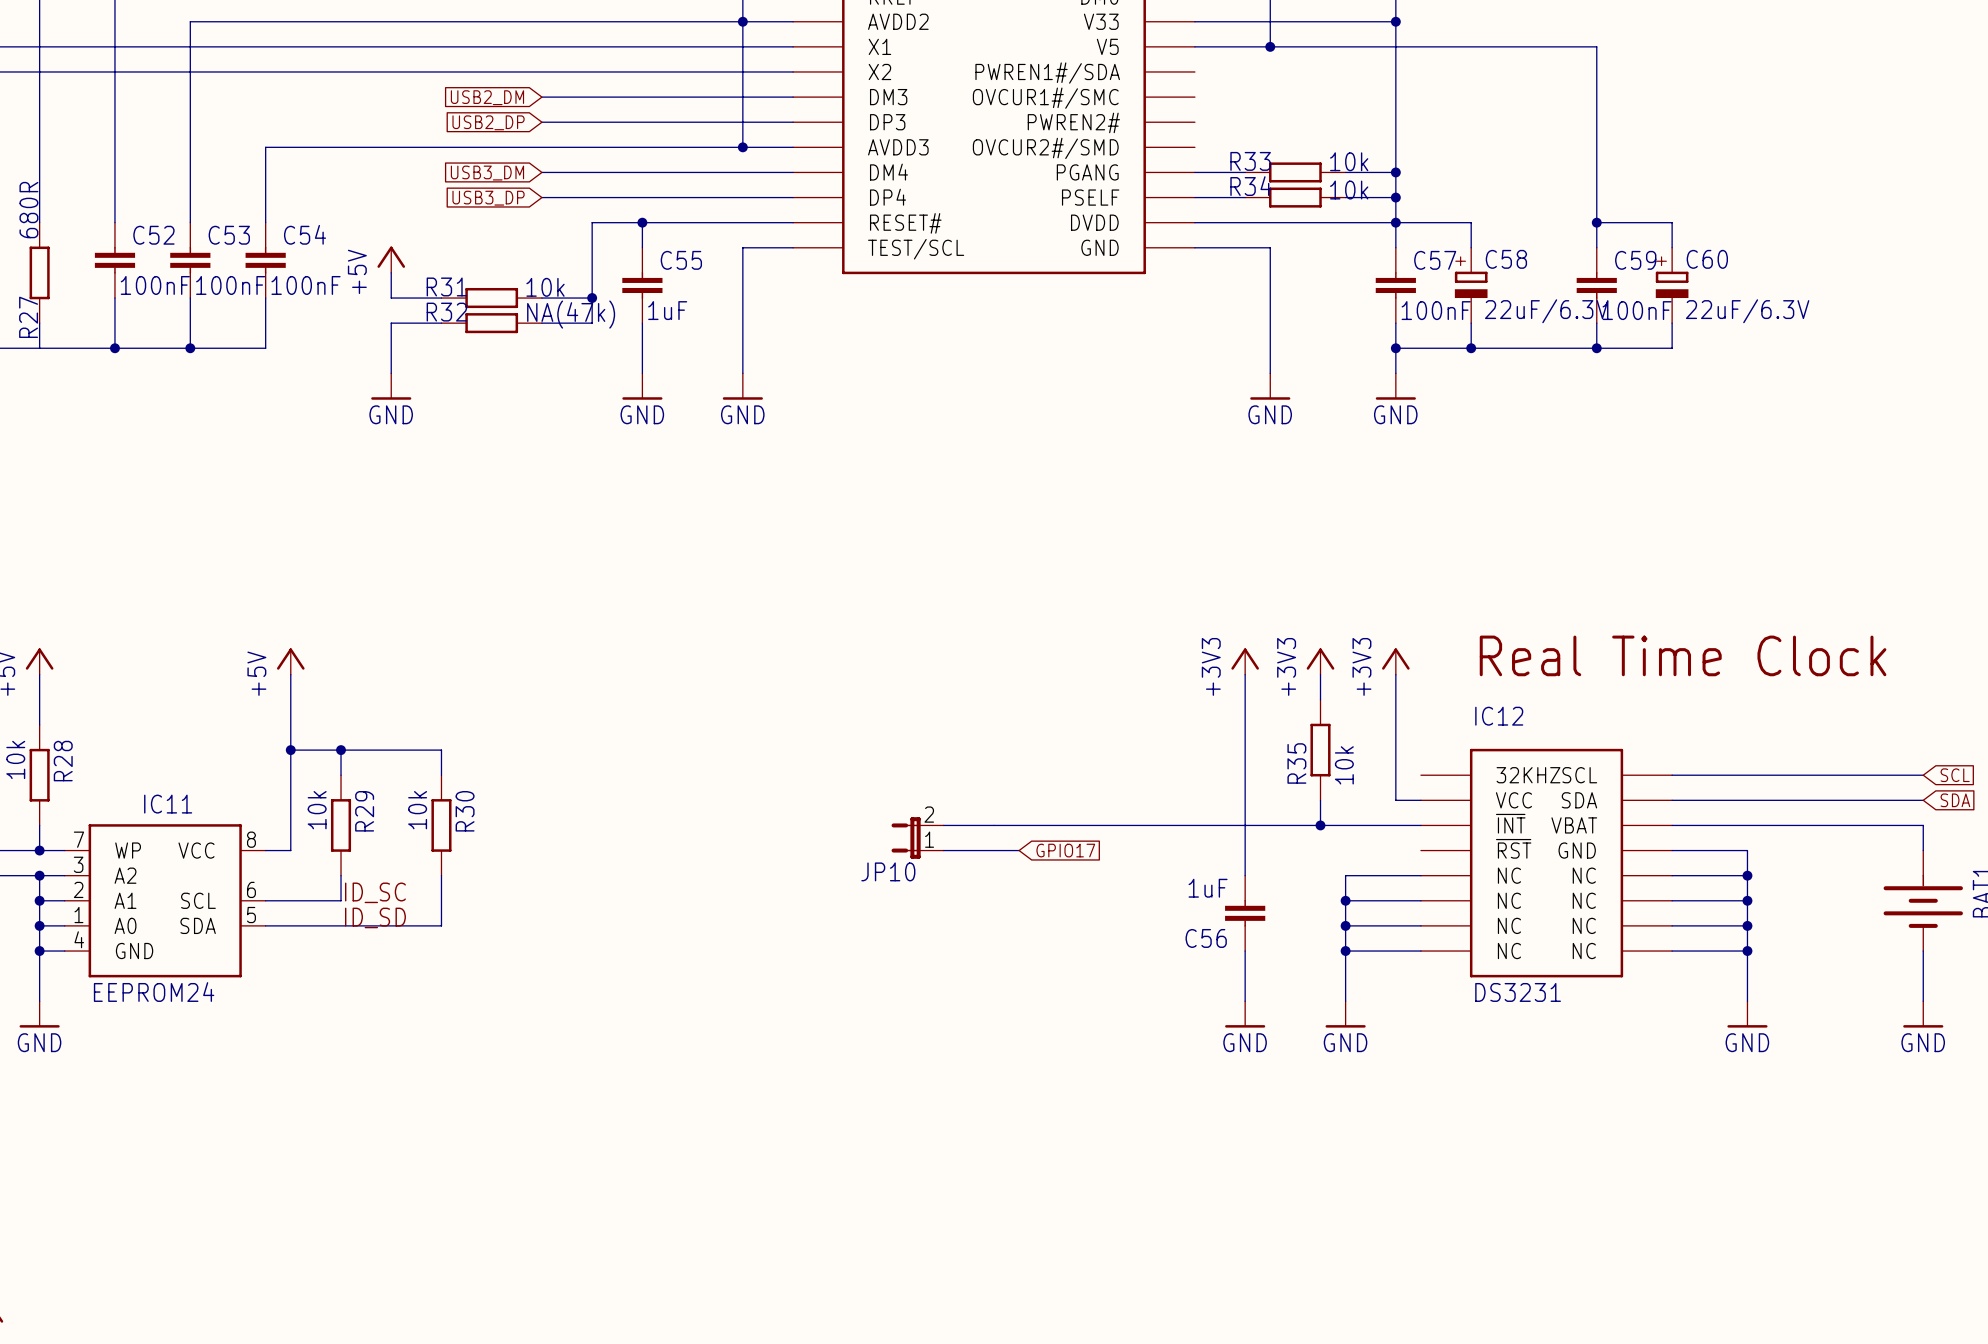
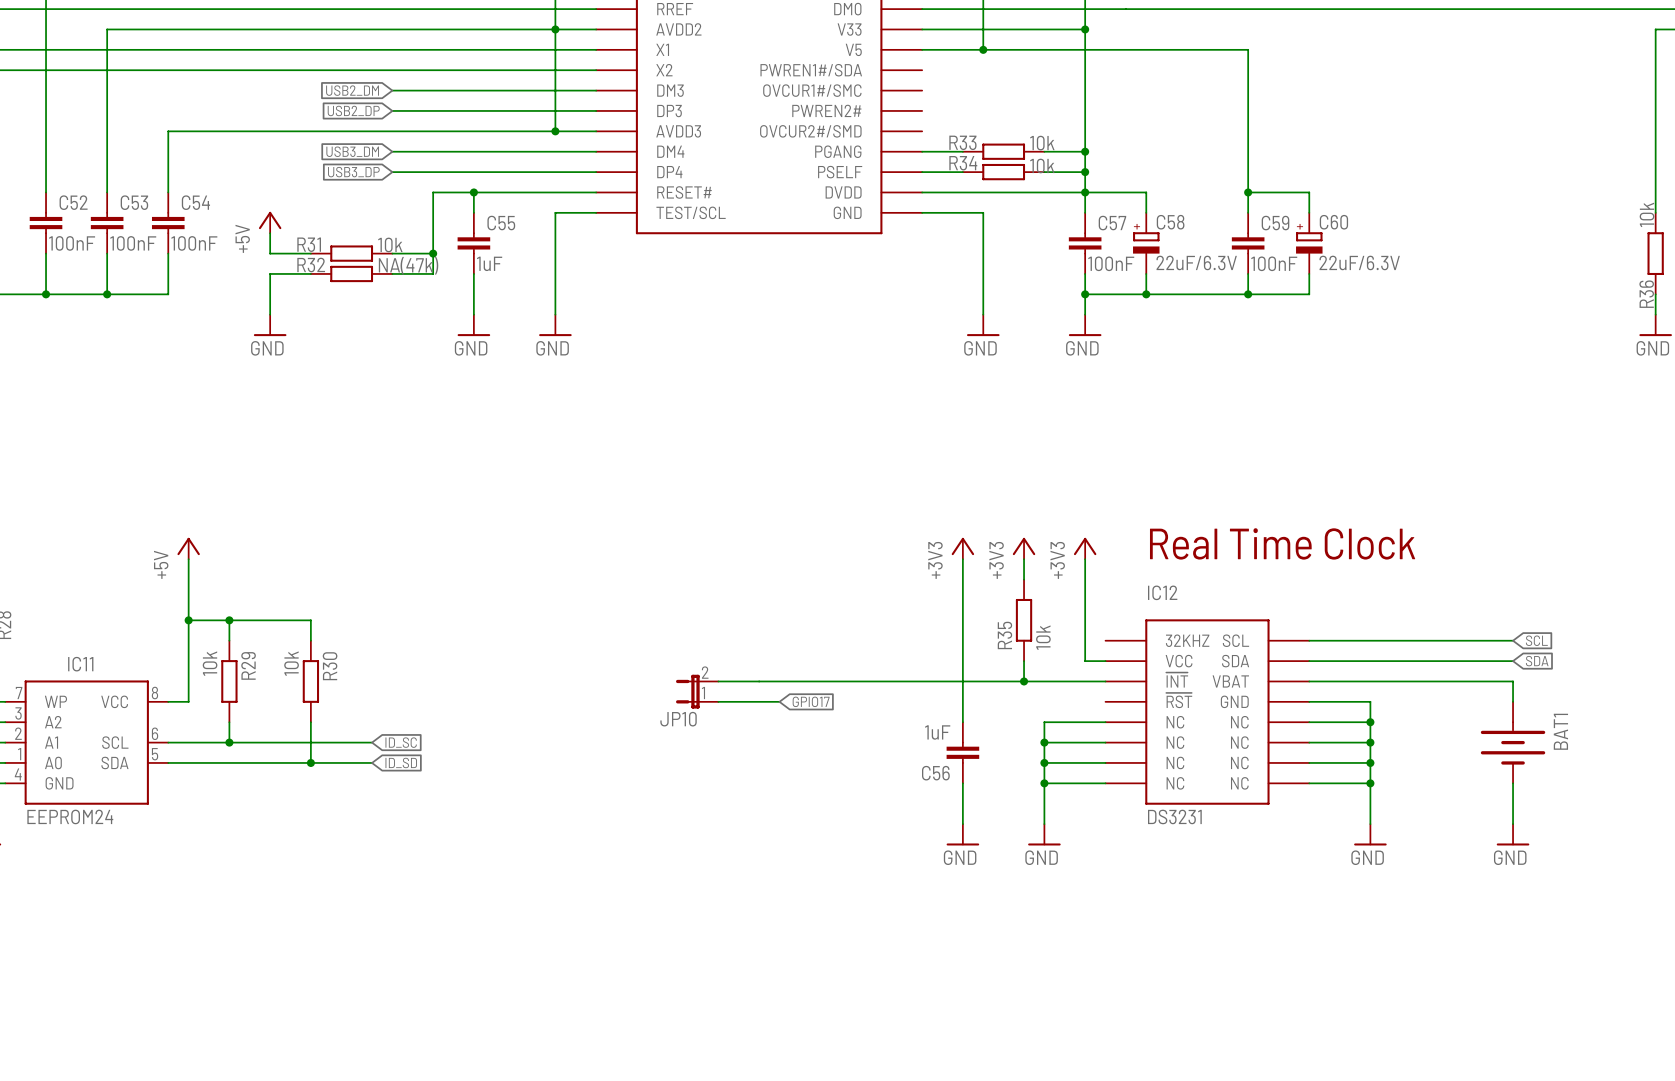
label: ID_SC (375, 892) -> none
wire: none -> (229, 742) (372, 742)
junction: none -> (229, 742)
global label: none -> ID_SC (401, 742)
label: ID_SD (375, 917) -> none
wire: none -> (310, 762) (372, 762)
junction: none -> (310, 762)
global label: none -> ID_SD (401, 762)

